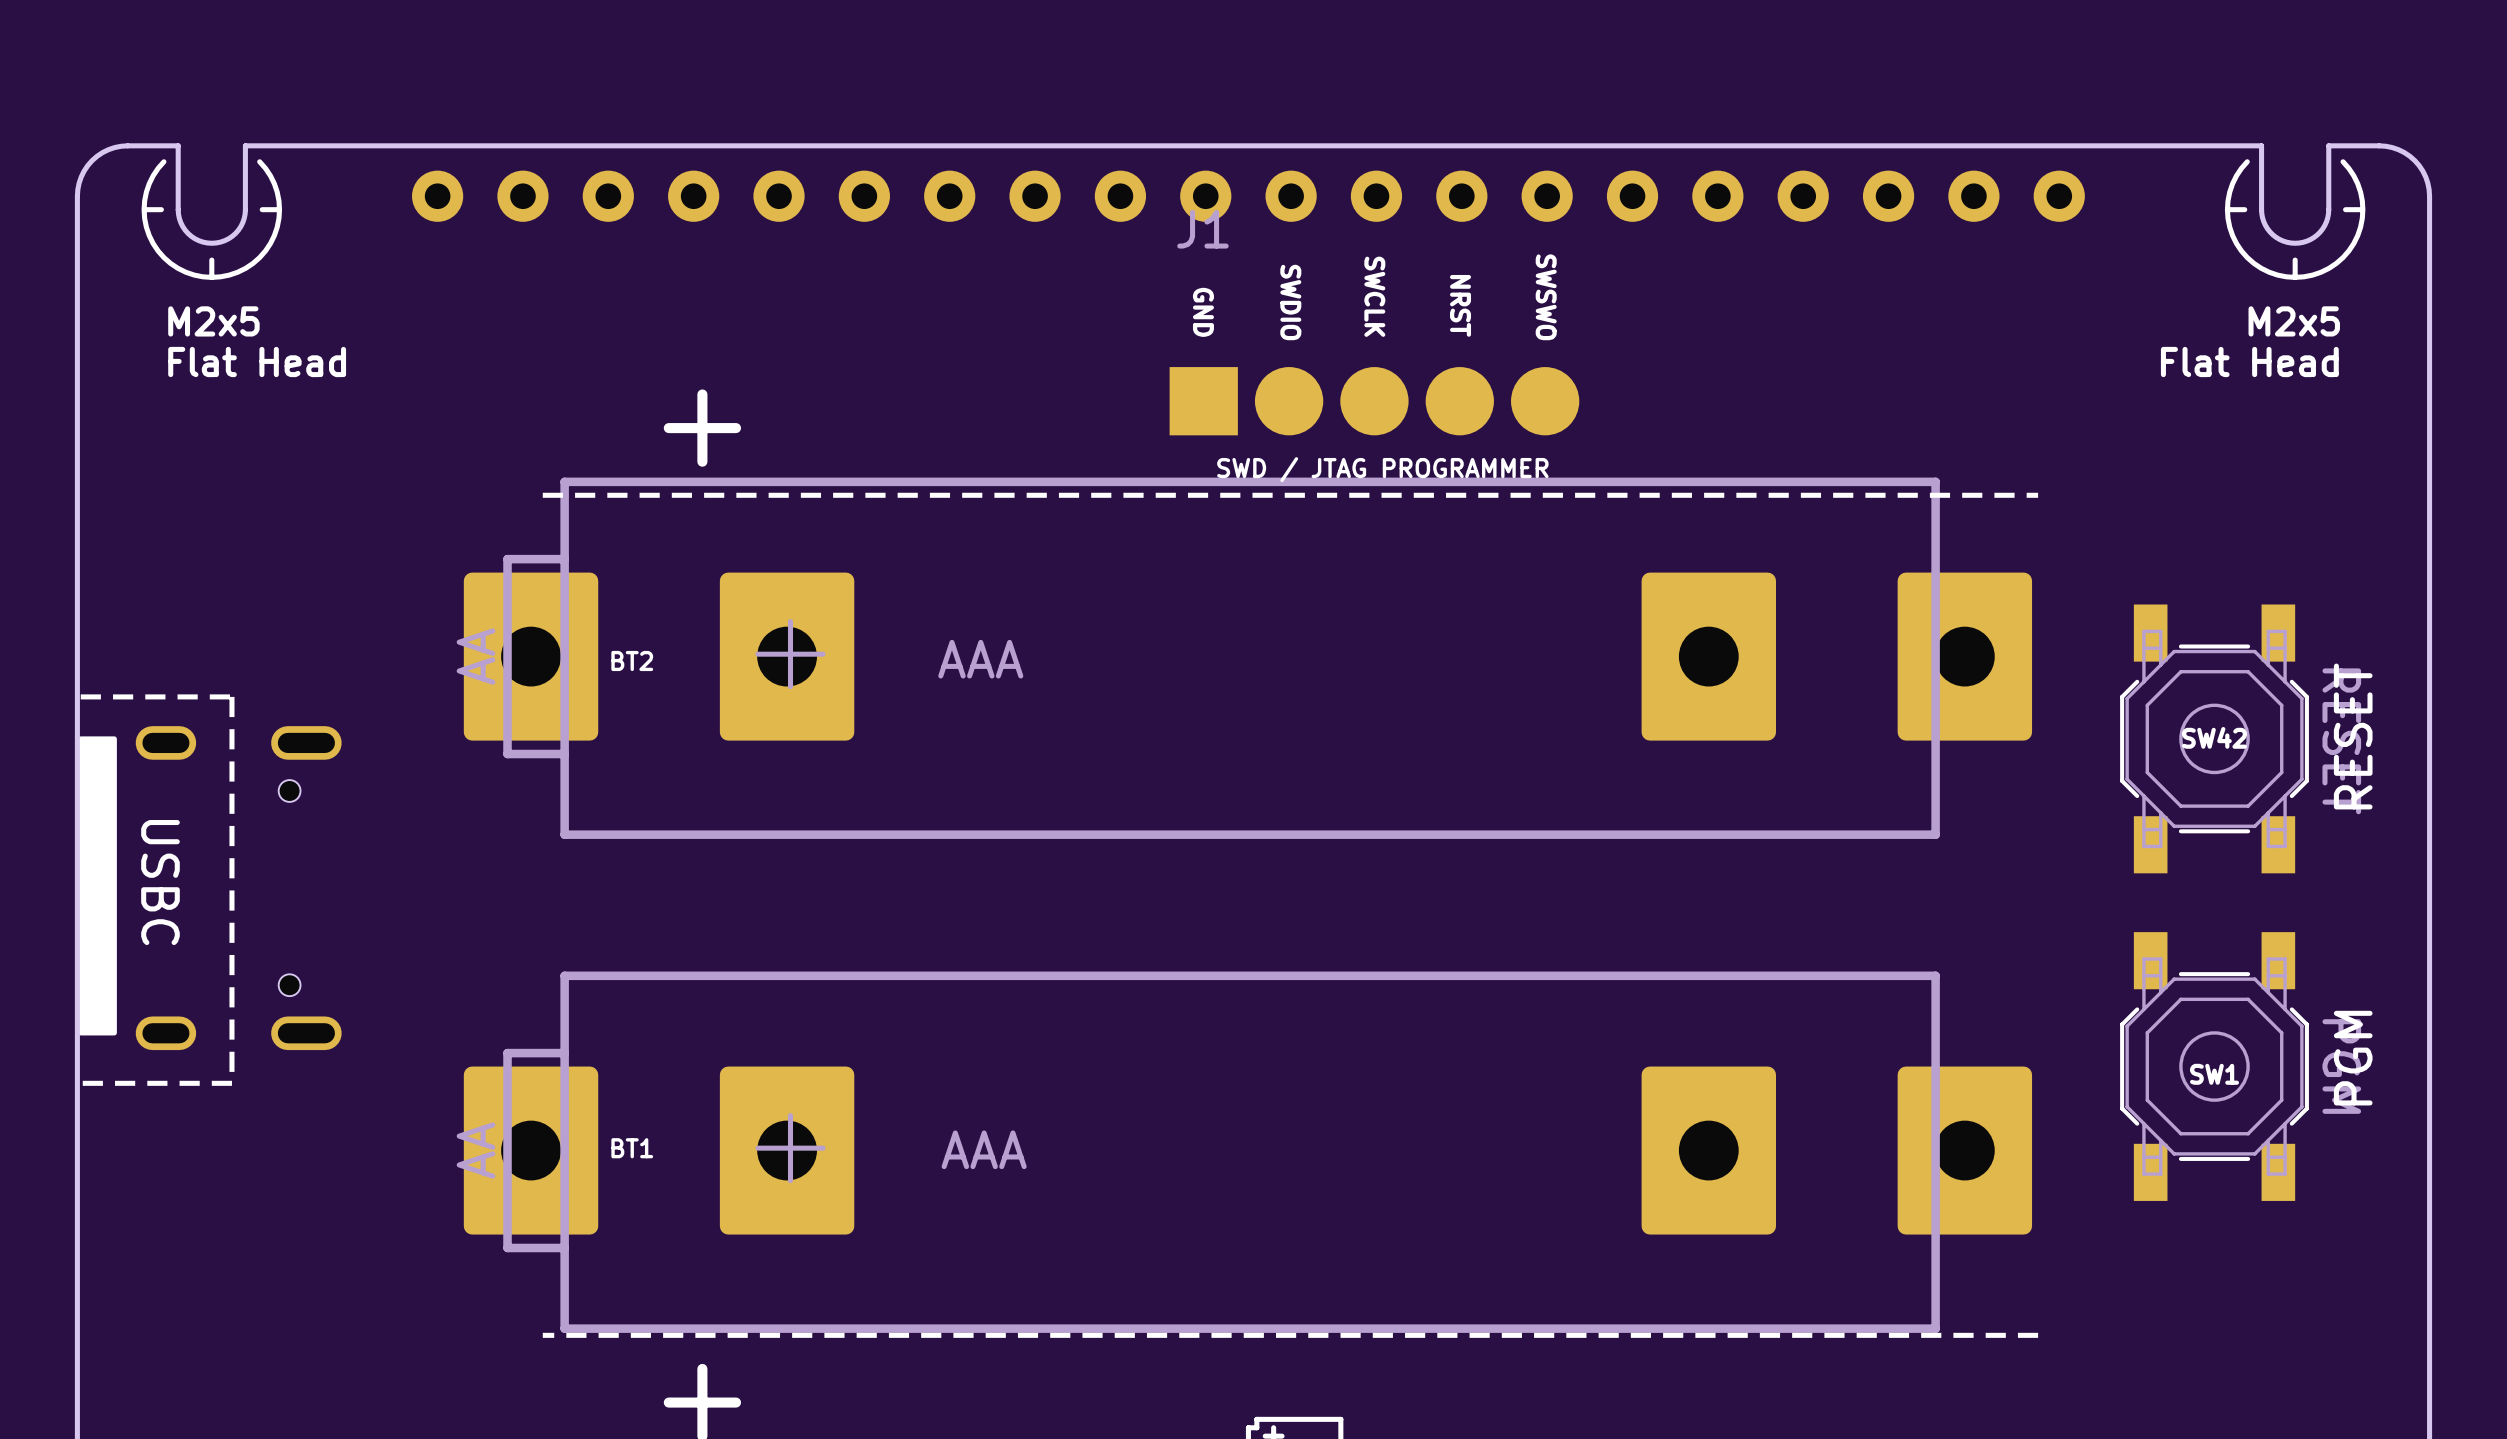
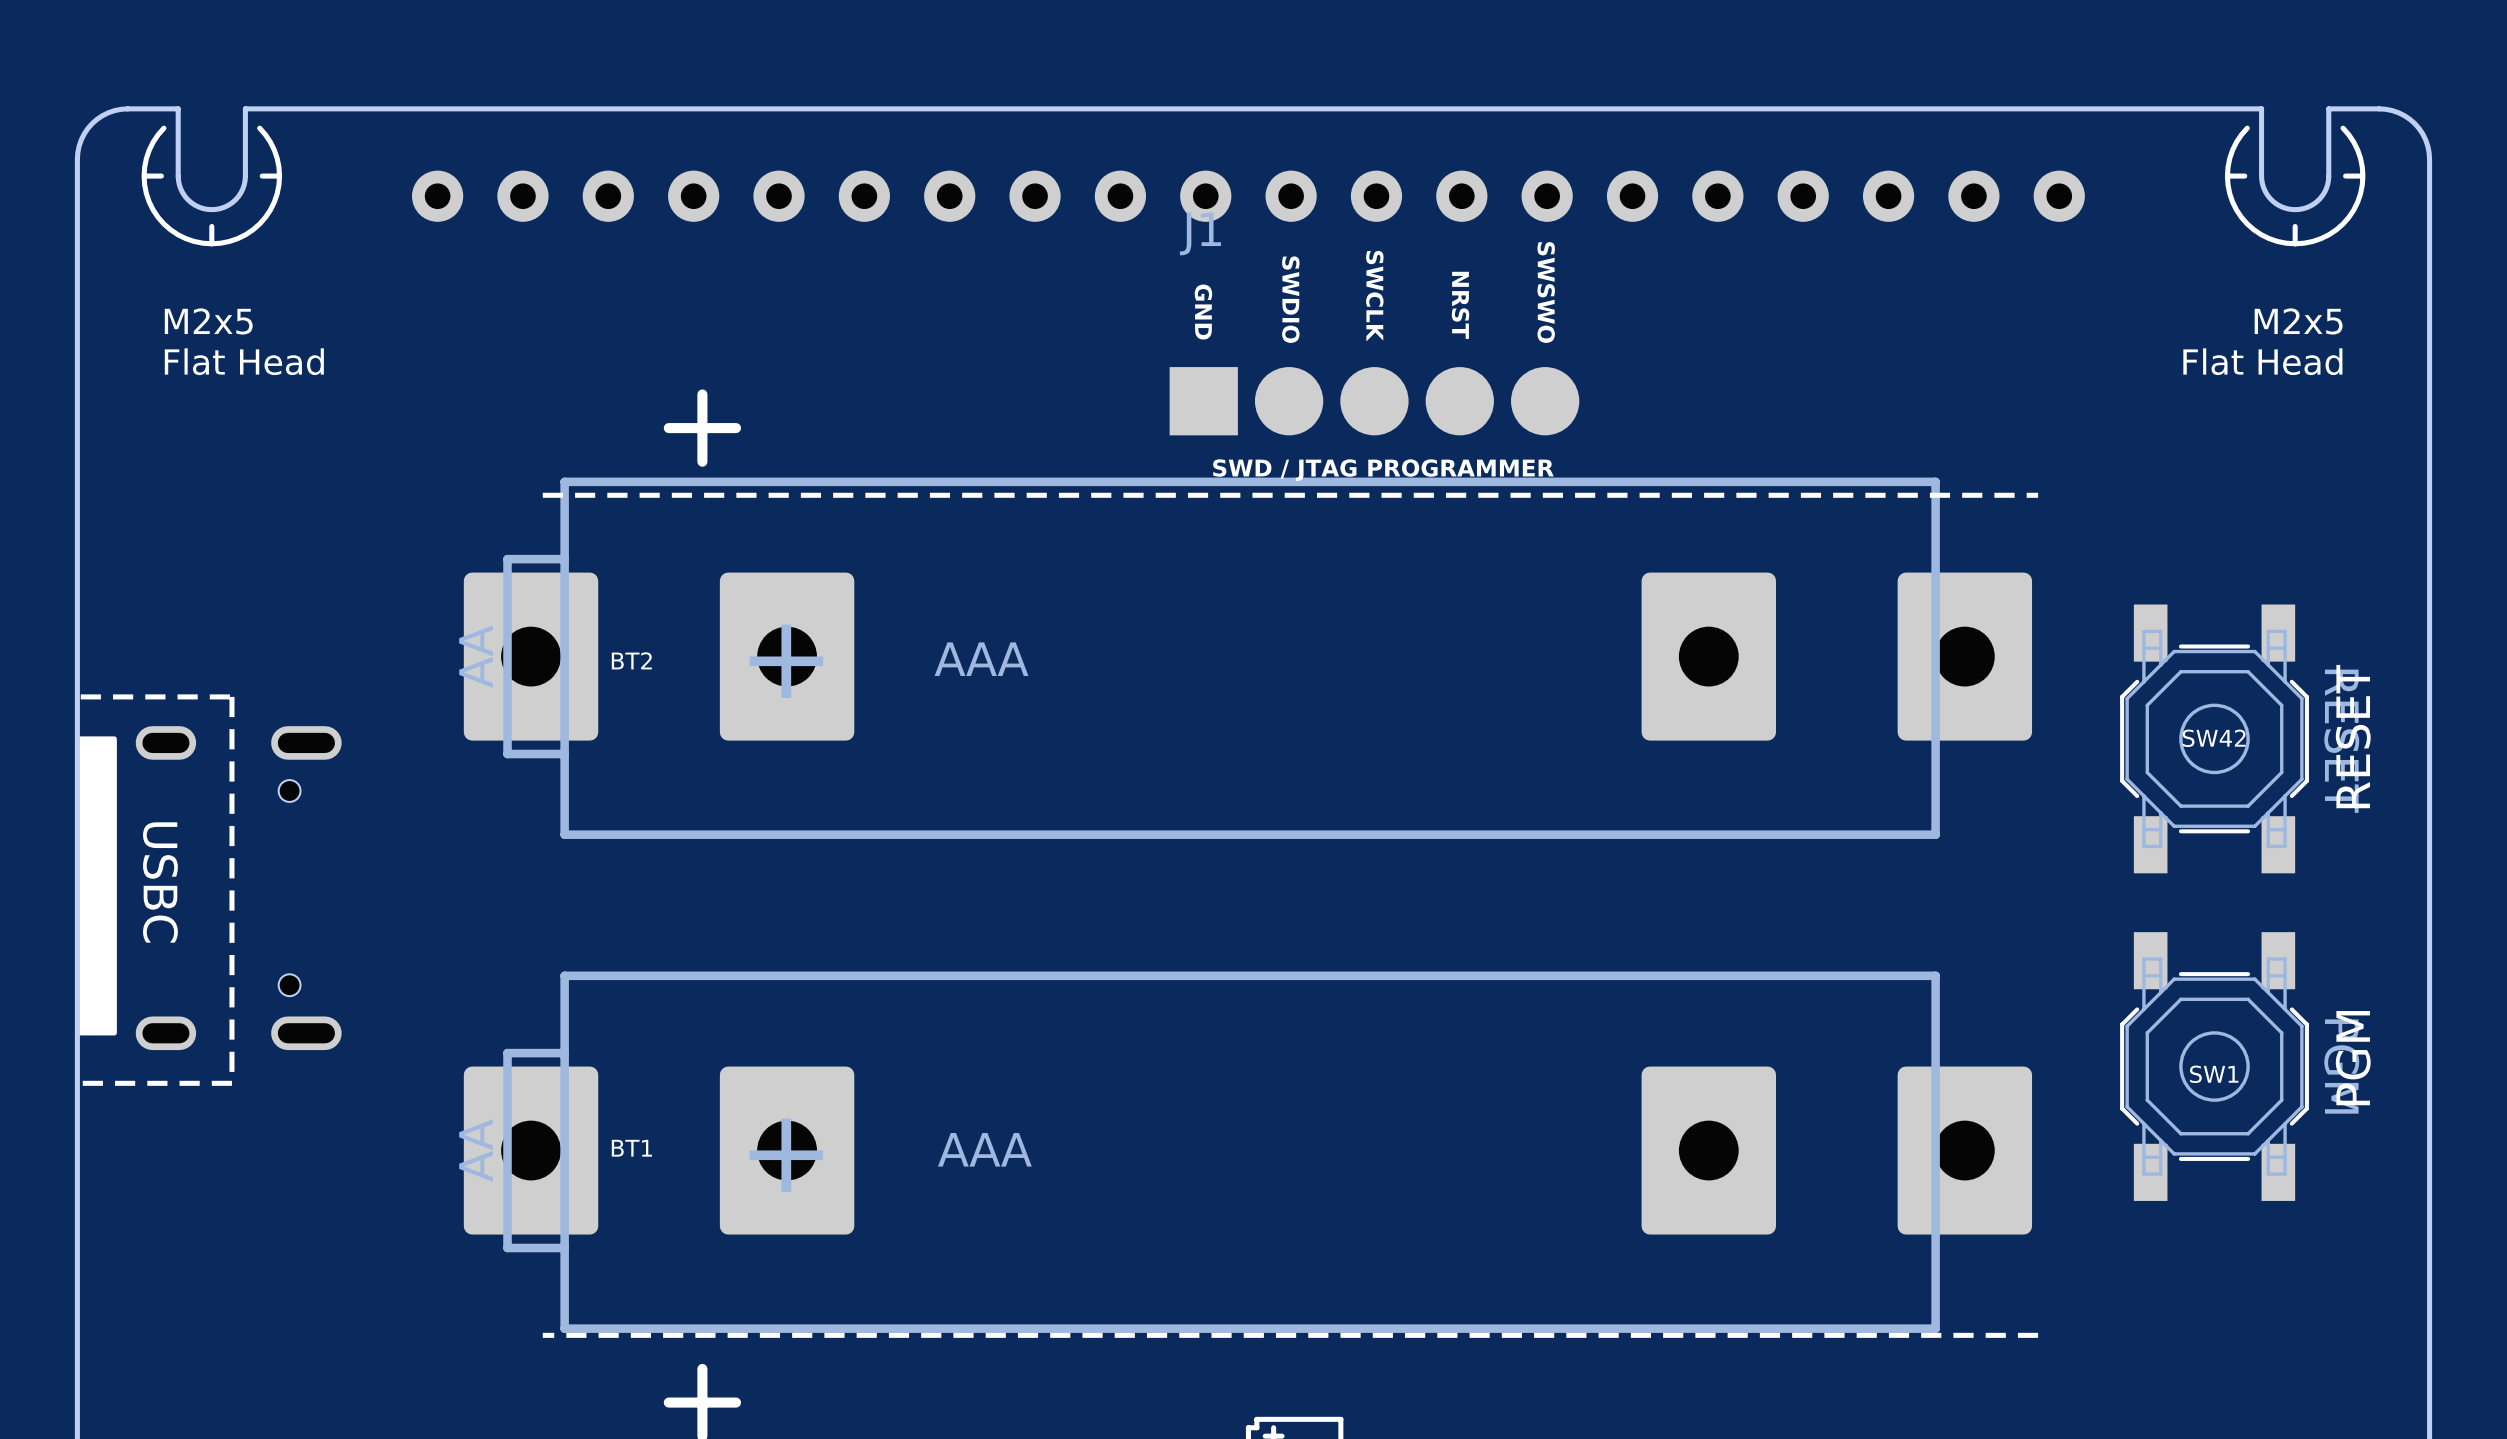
board edge: (178, 145) (121, 146) (102, 152) (92, 160) (84, 171) (79, 183) (77, 196) -> (178, 145) (178, 108) (121, 109) (102, 115) (87, 128) (79, 146) (77, 196)
board edge: (2261, 145) (245, 145) -> (2261, 145) (2261, 108) (245, 108) (245, 145)
board edge: (2328, 145) (2385, 146) (2404, 152) (2414, 160) (2422, 171) (2427, 183) (2429, 196) -> (2328, 145) (2328, 108) (2385, 109) (2404, 115) (2419, 128) (2427, 146) (2429, 196)
line: (259, 161) (274, 183) (278, 200) (278, 218) (274, 235) (259, 257) (245, 268) (229, 275) (211, 277) (194, 275) (177, 268) (163, 257) (149, 235) (144, 218) (144, 200) (149, 183) (163, 161) -> (259, 128) (274, 150) (278, 167) (278, 184) (274, 201) (259, 223) (245, 234) (229, 241) (211, 243) (194, 241) (177, 234) (163, 223) (149, 201) (144, 184) (146, 158) (153, 142) (163, 128)
line: (2343, 161) (2353, 175) (2360, 192) (2362, 218) (2357, 235) (2348, 250) (2329, 268) (2312, 275) (2295, 277) (2277, 275) (2261, 268) (2241, 250) (2232, 235) (2228, 218) (2229, 192) (2236, 175) (2247, 161) -> (2343, 128) (2353, 142) (2360, 158) (2362, 184) (2357, 201) (2348, 217) (2336, 229) (2312, 241) (2295, 243) (2277, 241) (2261, 234) (2241, 217) (2232, 201) (2228, 184) (2229, 158) (2236, 142) (2247, 128)
board edge: (245, 176) (245, 214) (240, 226) (228, 238) (211, 243) (195, 238) (182, 226) (178, 214) (178, 176) -> (245, 176) (242, 188) (235, 199) (224, 207) (211, 209) (198, 207) (188, 199) (180, 188) (178, 176)
board edge: (2328, 176) (2328, 213) (2324, 225) (2314, 237) (2295, 243) (2276, 237) (2265, 225) (2261, 213) (2261, 176) -> (2328, 176) (2326, 187) (2320, 198) (2307, 207) (2295, 209) (2283, 207) (2272, 201) (2263, 187) (2261, 176)
line: (161, 209) (144, 209) -> (161, 176) (144, 176)
line: (279, 209) (262, 209) -> (279, 176) (262, 176)
line: (2244, 209) (2227, 209) -> (2244, 176) (2227, 176)
line: (2362, 209) (2345, 209) -> (2362, 176) (2345, 176)
line: (211, 260) (211, 277) -> (211, 226) (211, 243)
line: (2295, 260) (2295, 277) -> (2295, 226) (2295, 243)

